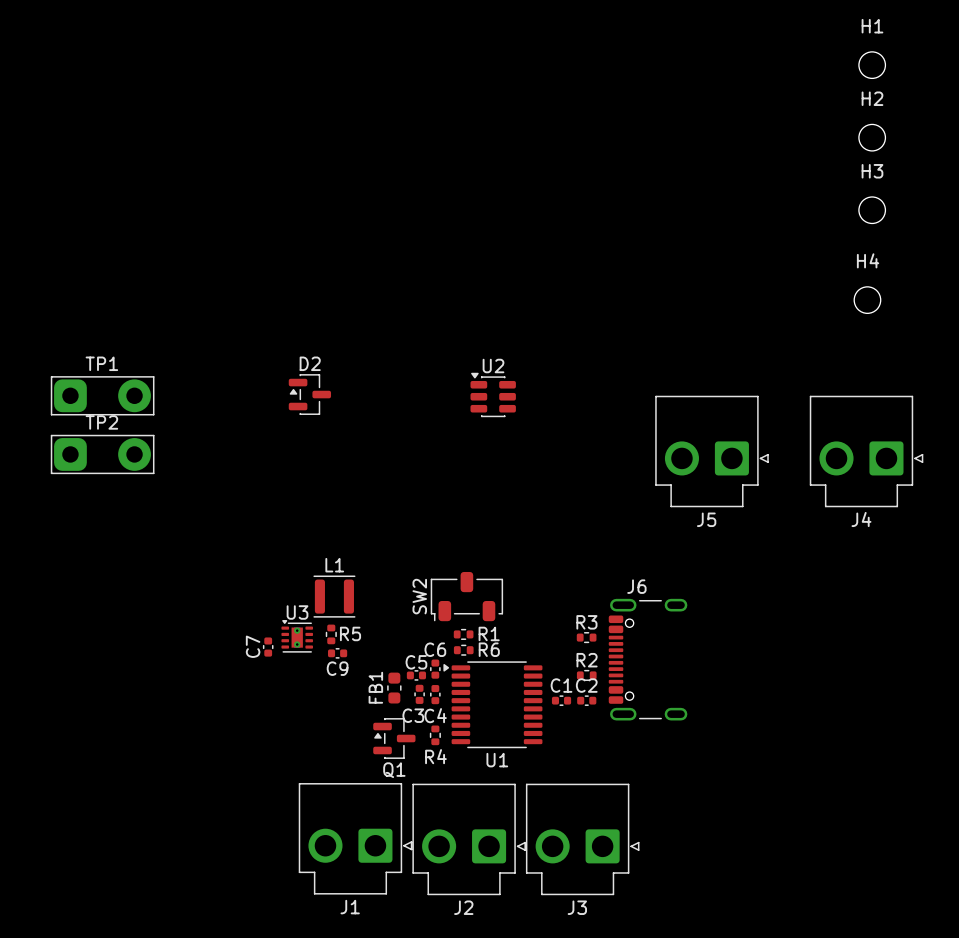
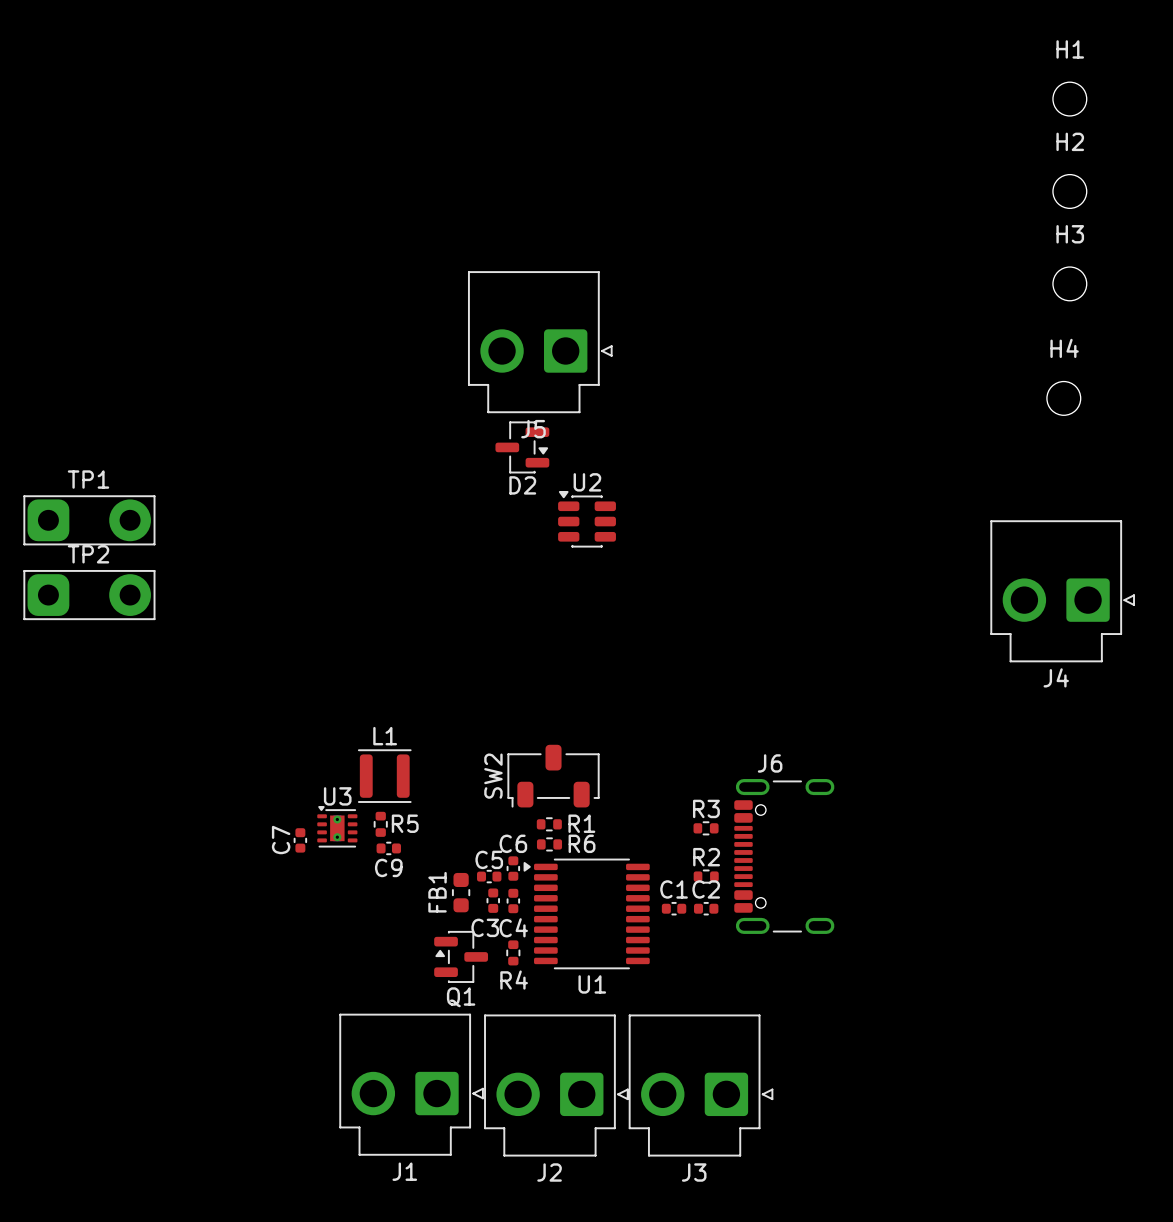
D2 rotation: 0° (309, 394) -> 180° (522, 447)
D2 position: (309, 394) -> (522, 447)
J5 position: (711, 451) -> (540, 342)

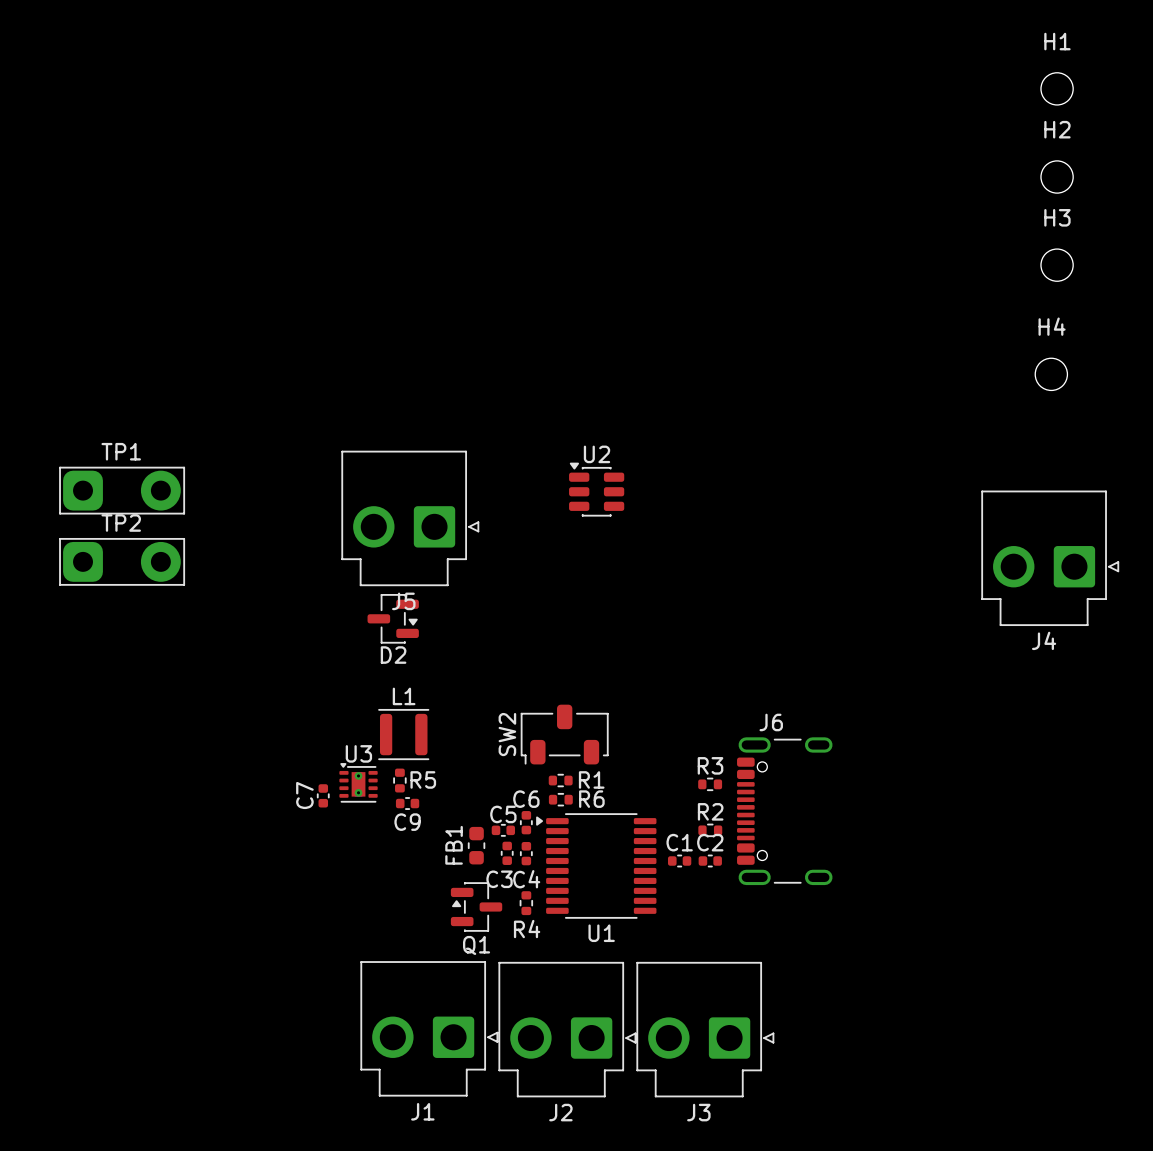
J5 position: (540, 342) -> (410, 518)
D2 position: (522, 447) -> (393, 618)

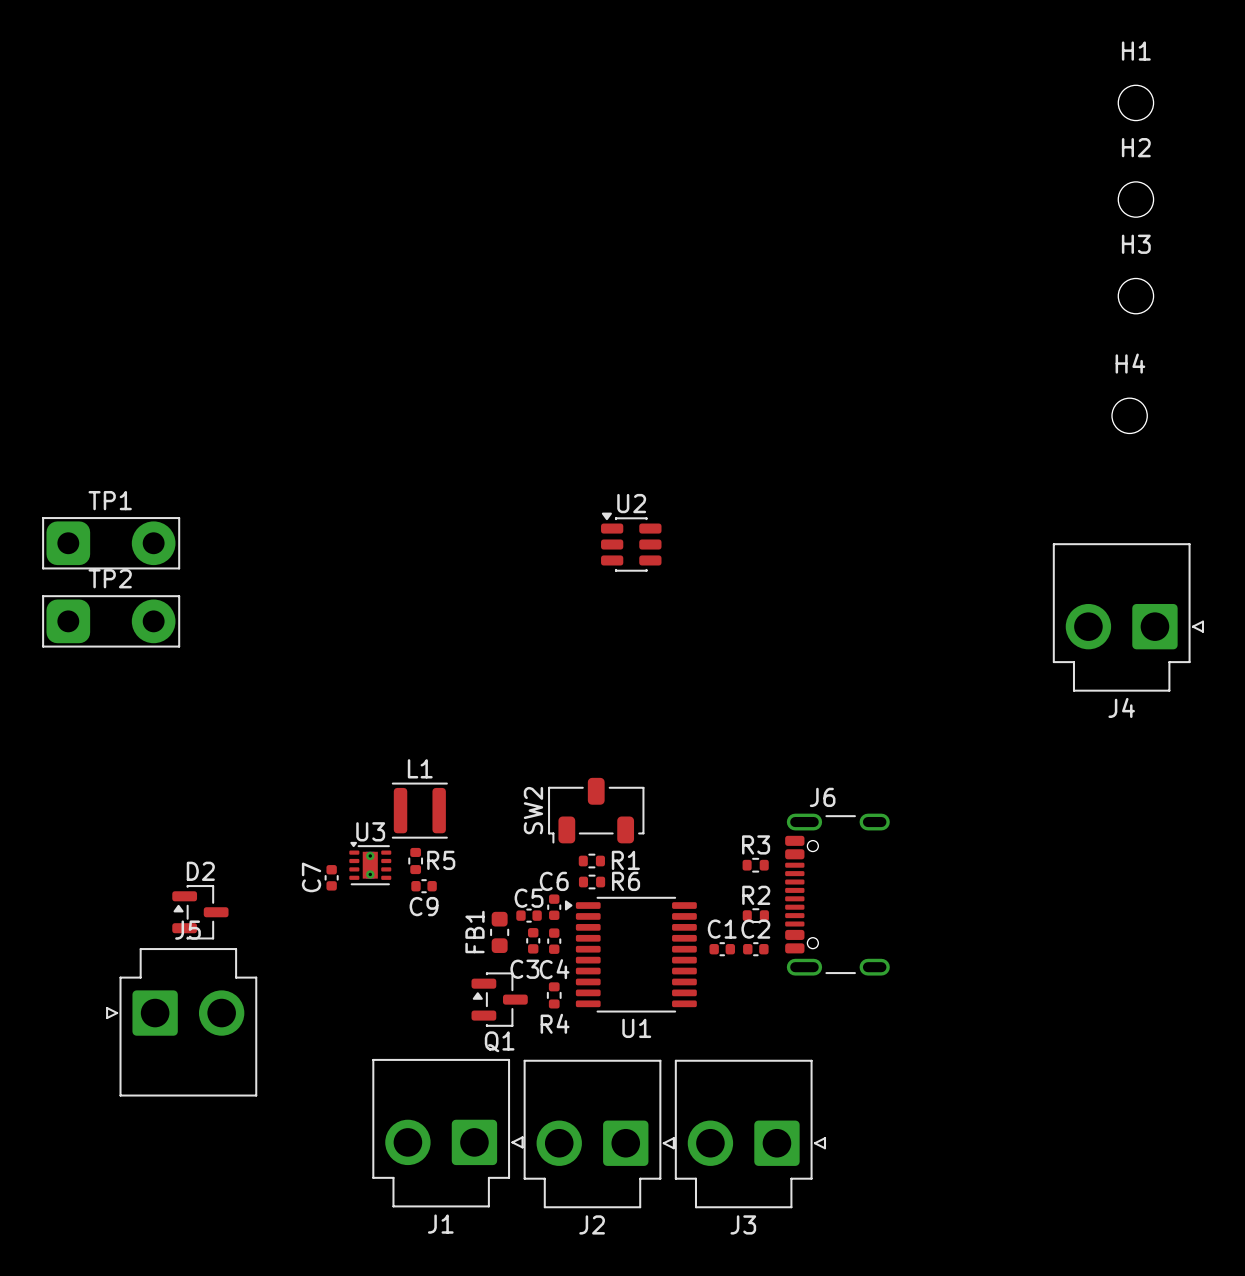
J5 rotation: 0° (410, 518) -> 180° (181, 1022)
J5 position: (410, 518) -> (181, 1022)
D2 rotation: 0° (393, 618) -> 180° (200, 912)
D2 position: (393, 618) -> (200, 912)

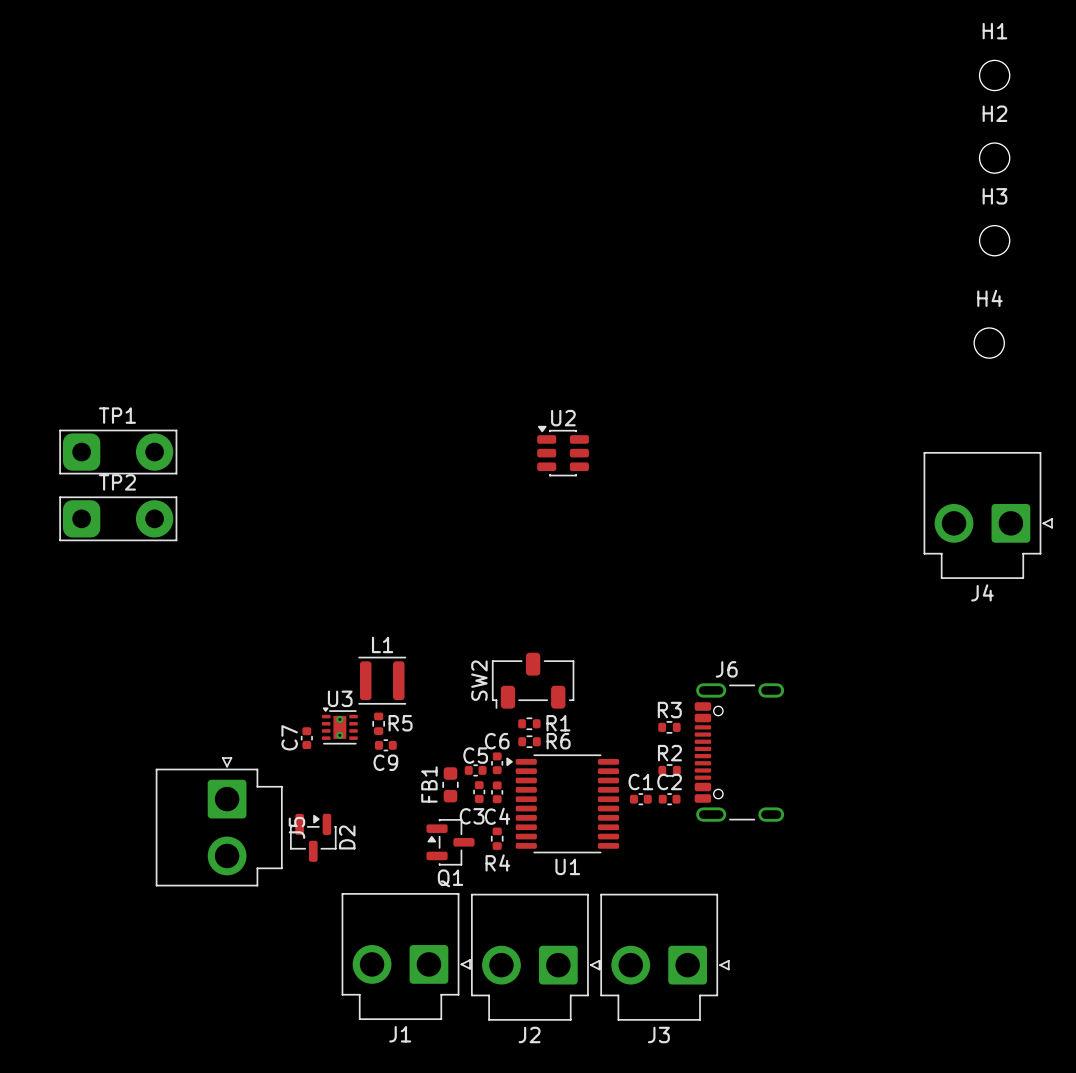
D2 rotation: 0° (200, 912) -> 90° clockwise (313, 837)
D2 position: (200, 912) -> (313, 837)
J5 rotation: 0° (181, 1022) -> 90° clockwise (219, 821)

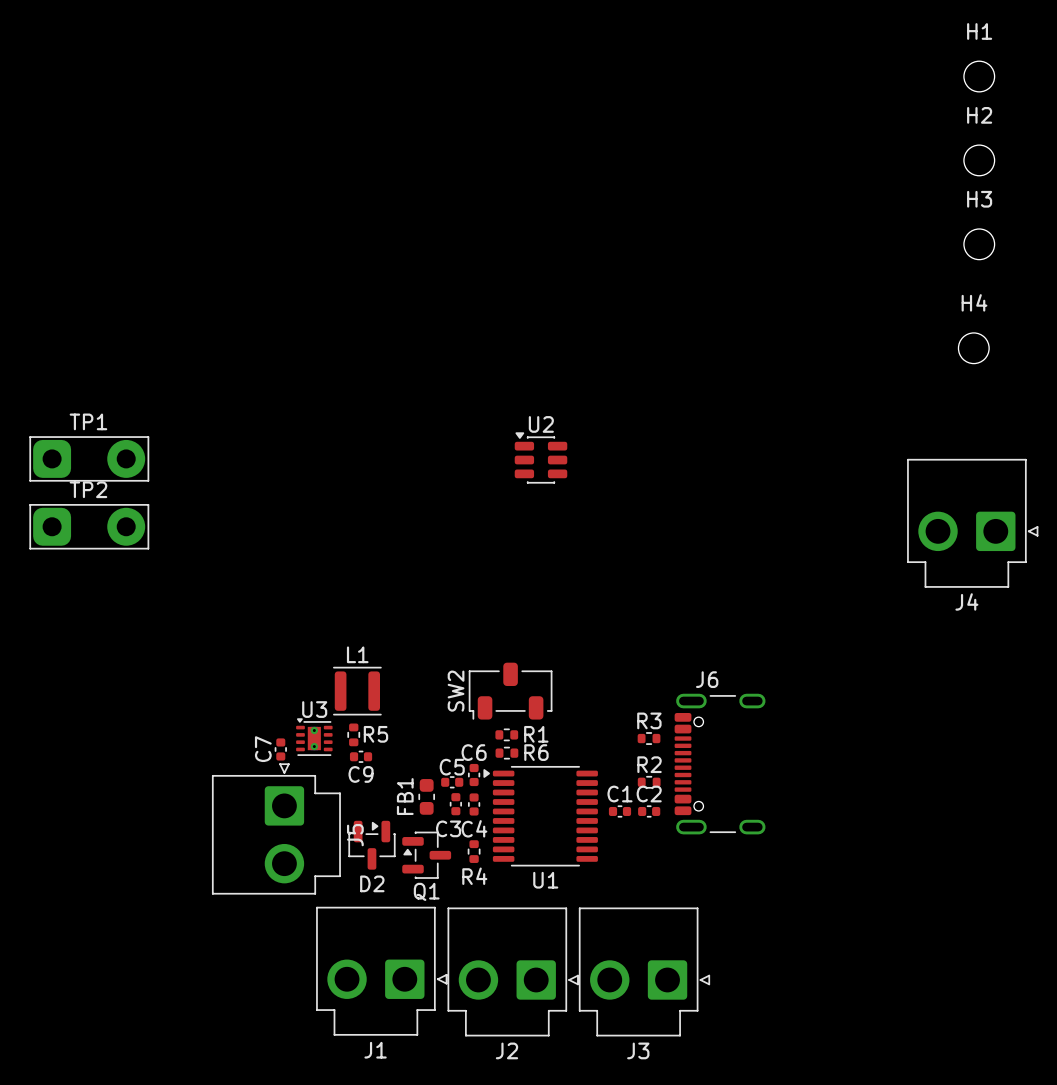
J5 position: (219, 821) -> (276, 828)
D2 position: (313, 837) -> (371, 845)
D2 name rotation: 0° (347, 837) -> 90° clockwise (372, 883)
D2 name position: D2 (347, 837) -> D2 (372, 883)

